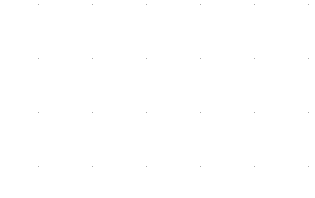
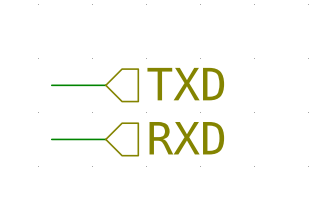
hierarchical label: none -> TXD (185, 84)
wire: none -> (51, 85) (105, 85)
hierarchical label: none -> RXD (186, 138)
wire: none -> (51, 139) (105, 139)

